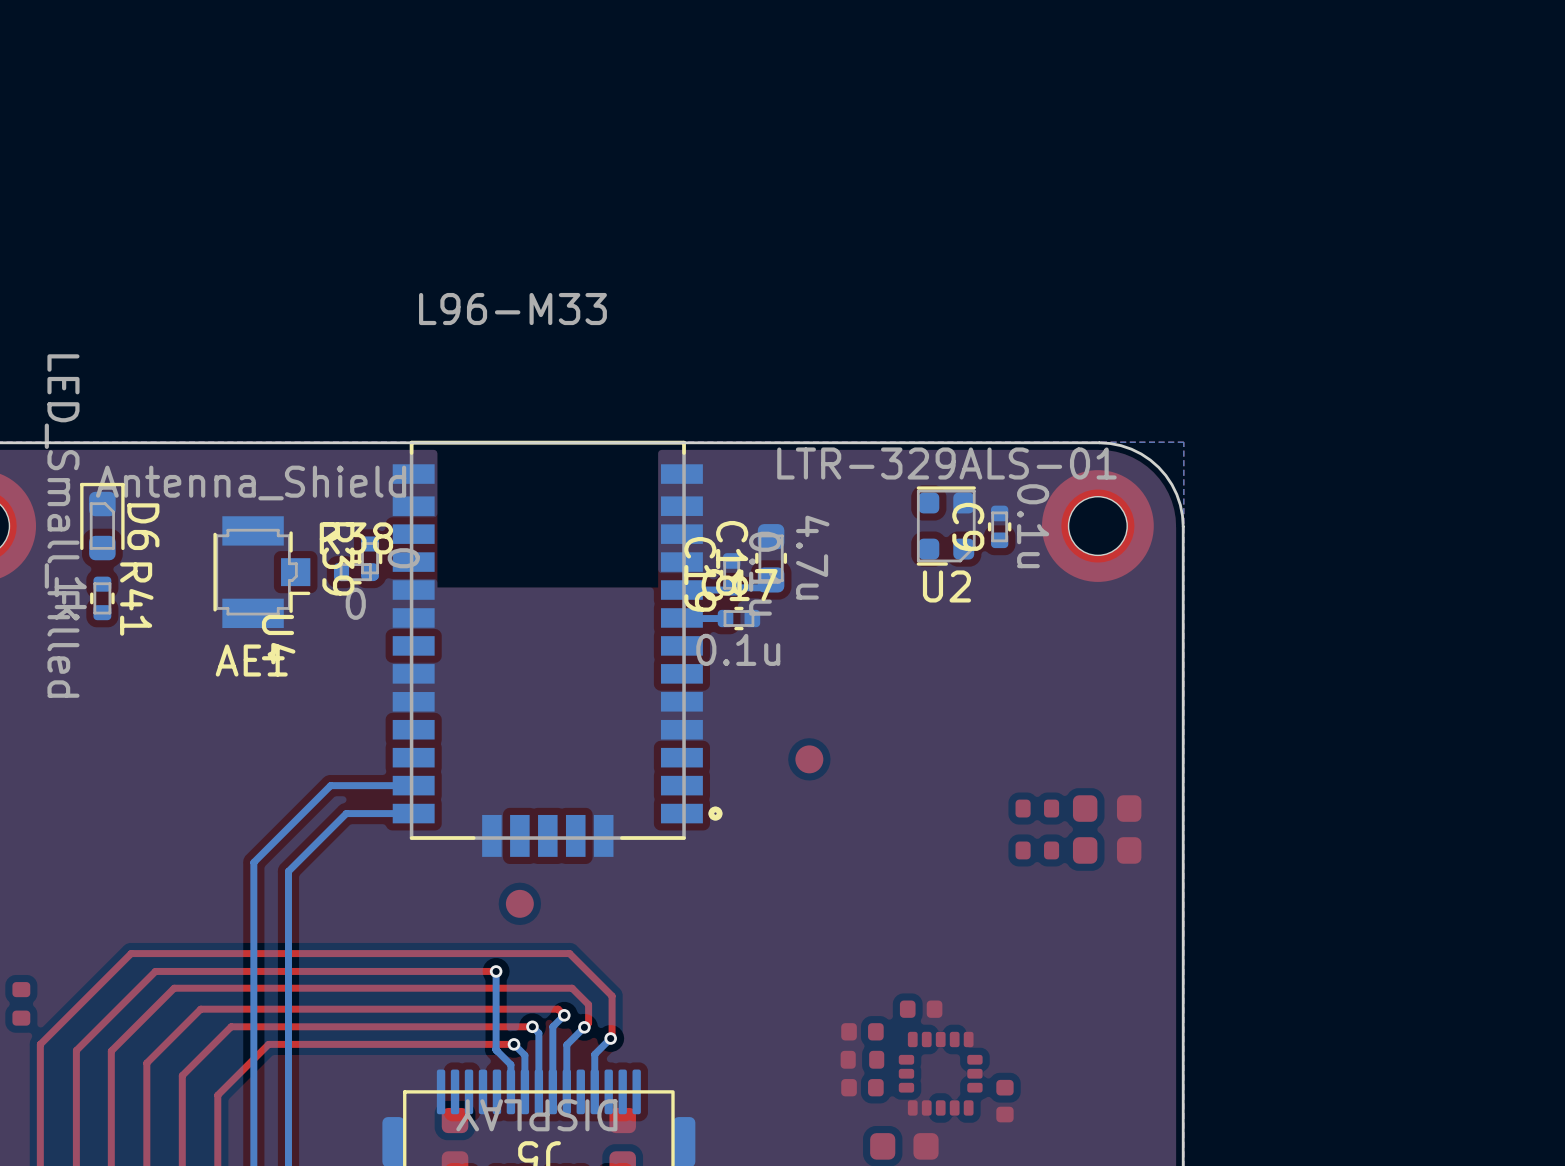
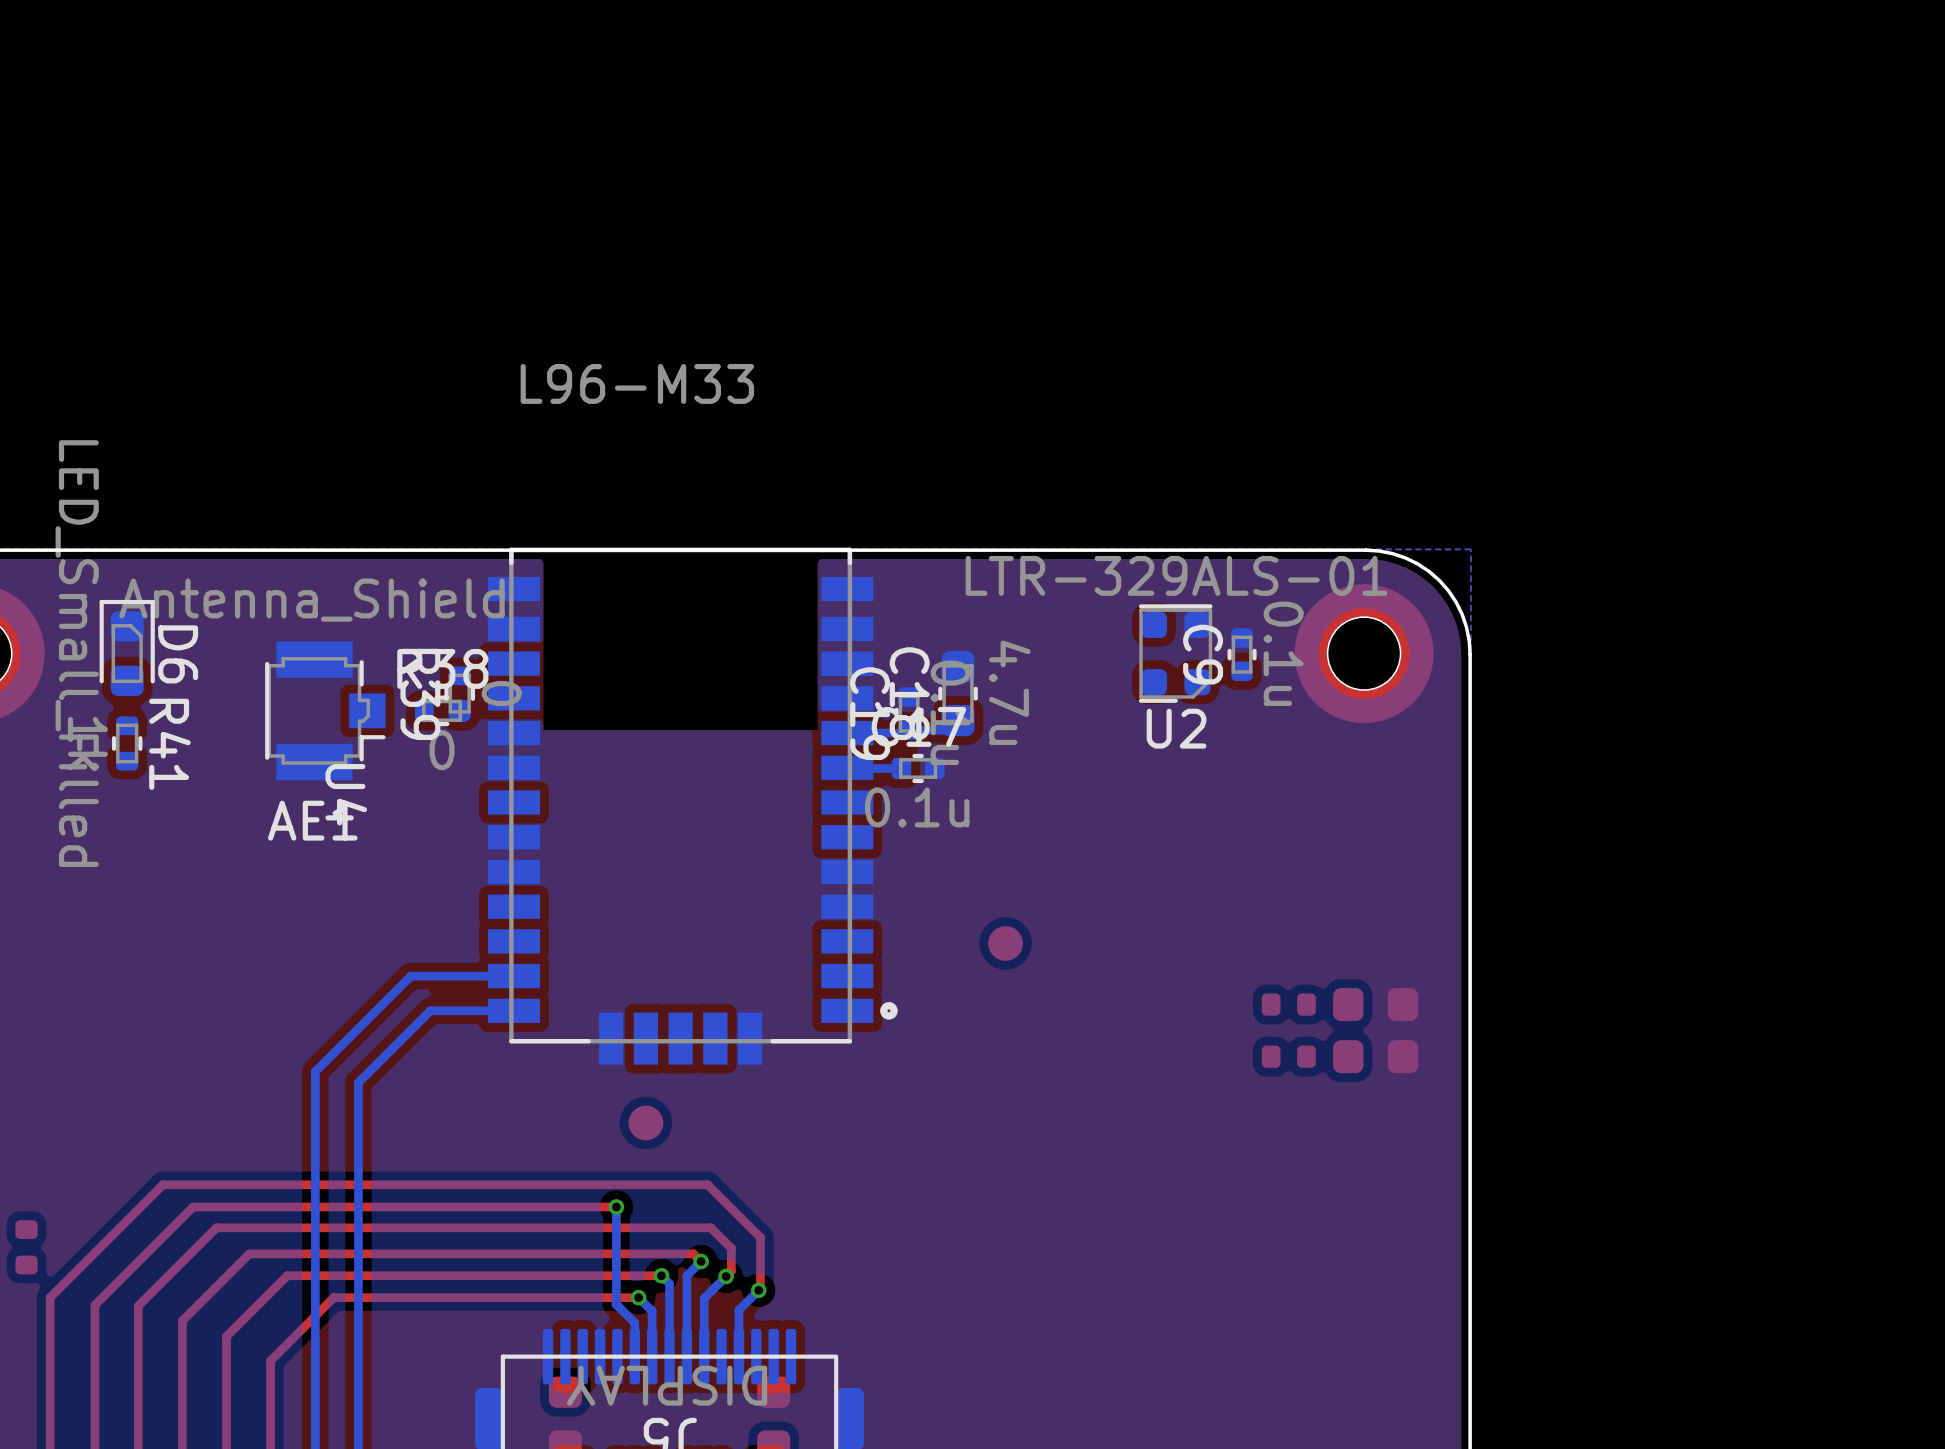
part: (921, 1009) -> none
part: (862, 1031) -> none
part: (862, 1059) -> none
part: (940, 1073) -> none
part: (862, 1087) -> none
part: (1004, 1101) -> none
part: (904, 1146) -> none

